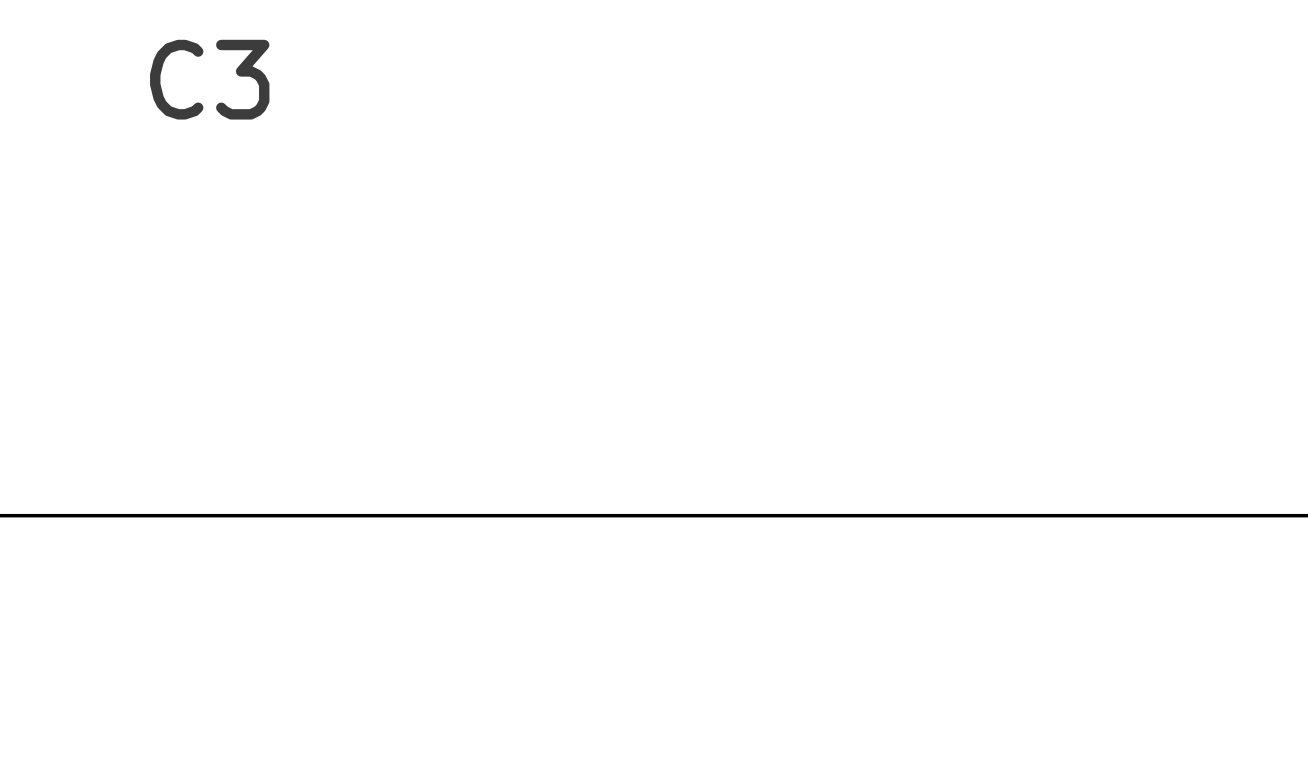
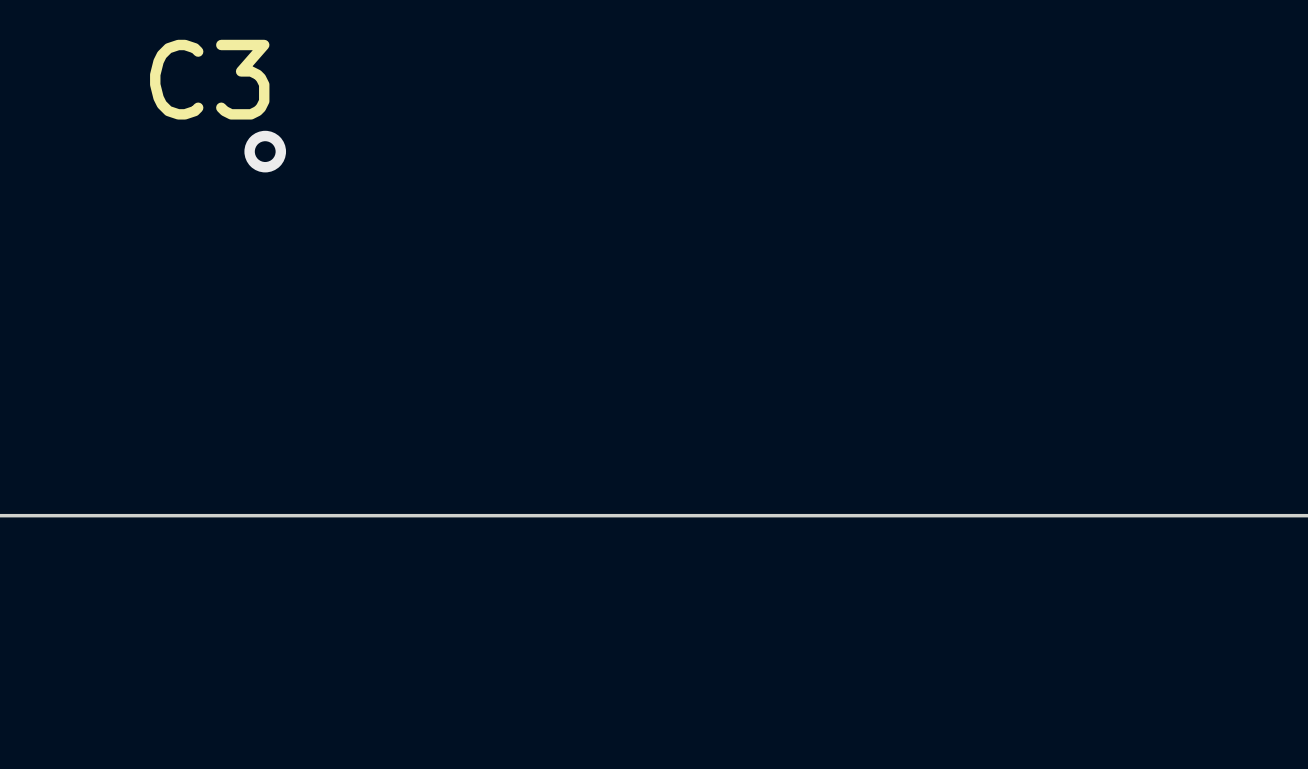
via: none -> (265, 151)

